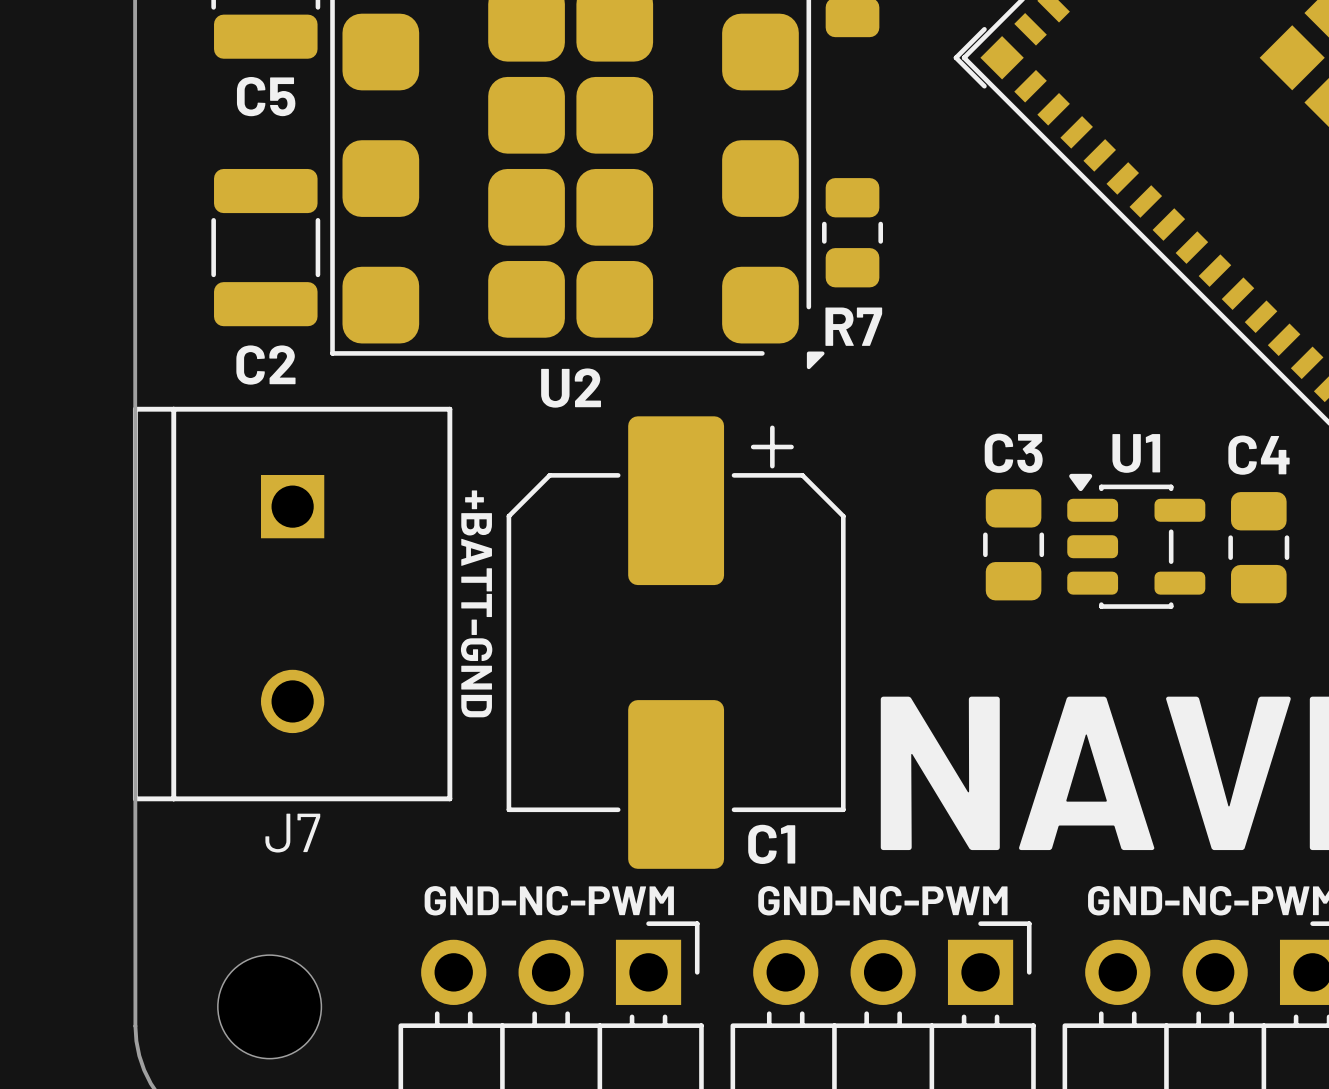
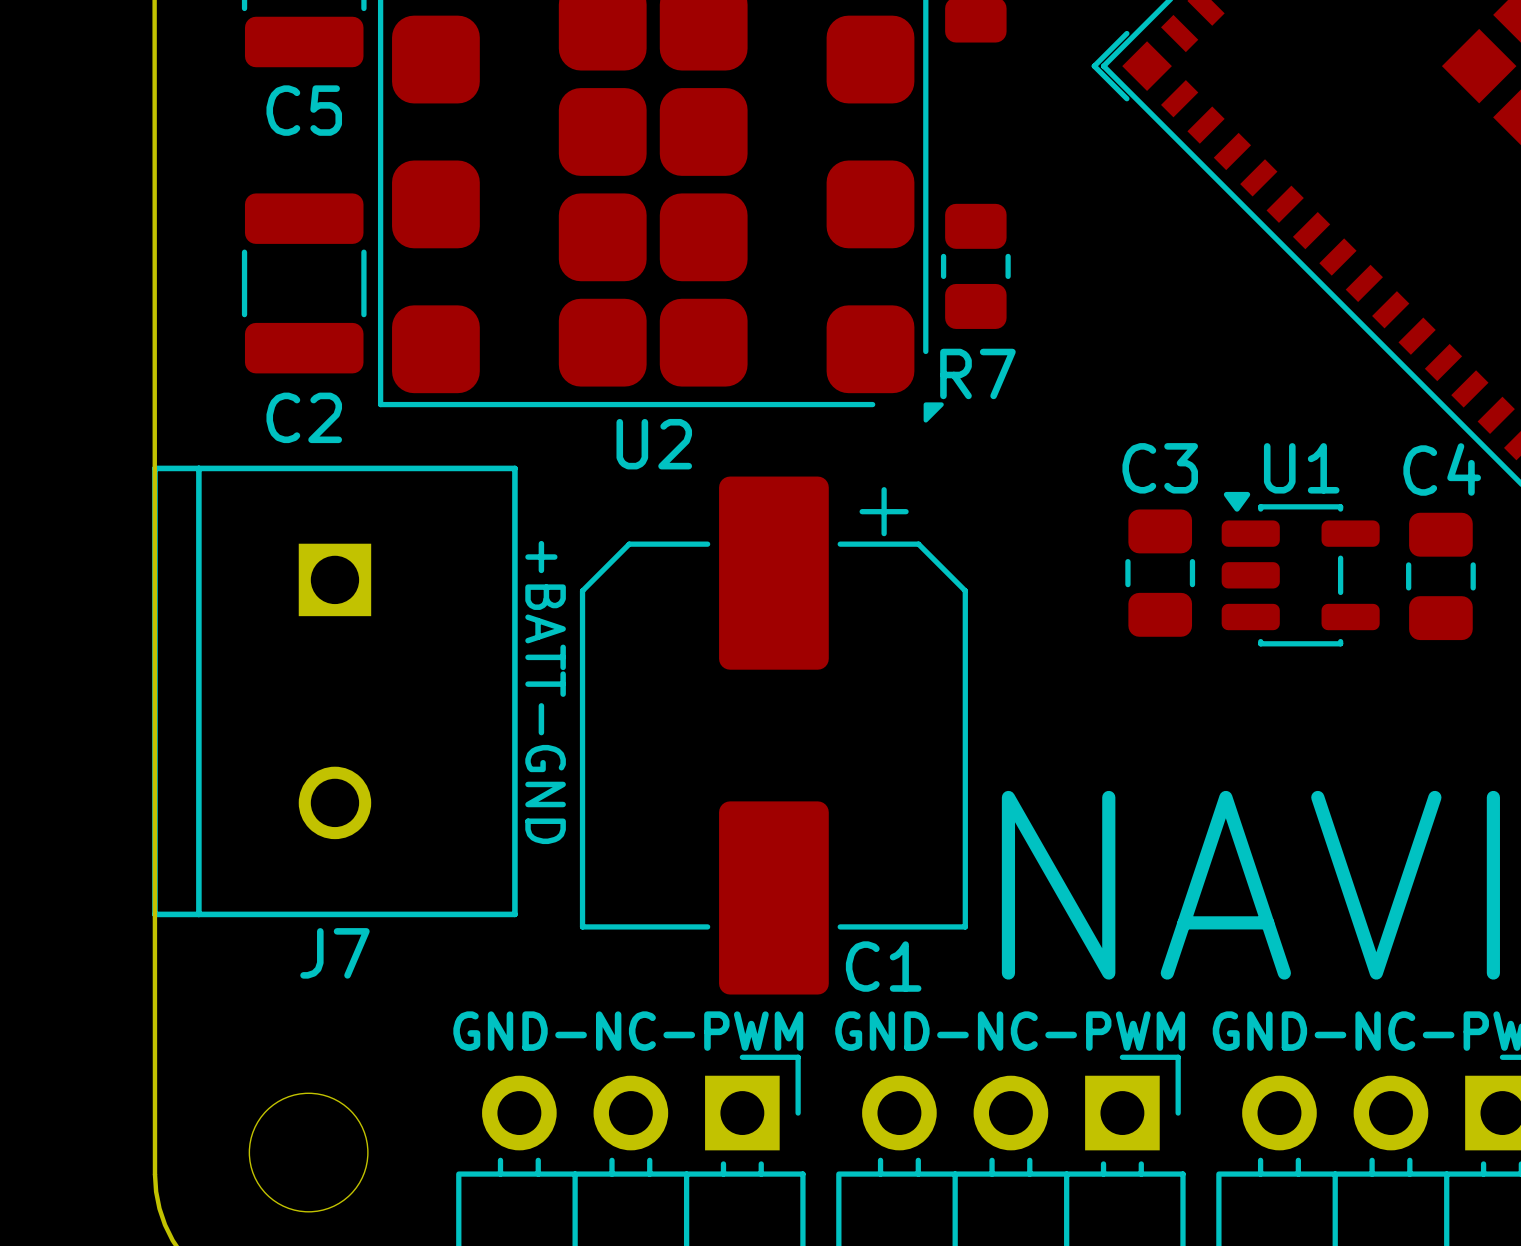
U1 position: (1136, 541) -> (1300, 569)
C3 position: (1013, 544) -> (1160, 573)
C4 position: (1258, 547) -> (1440, 576)

